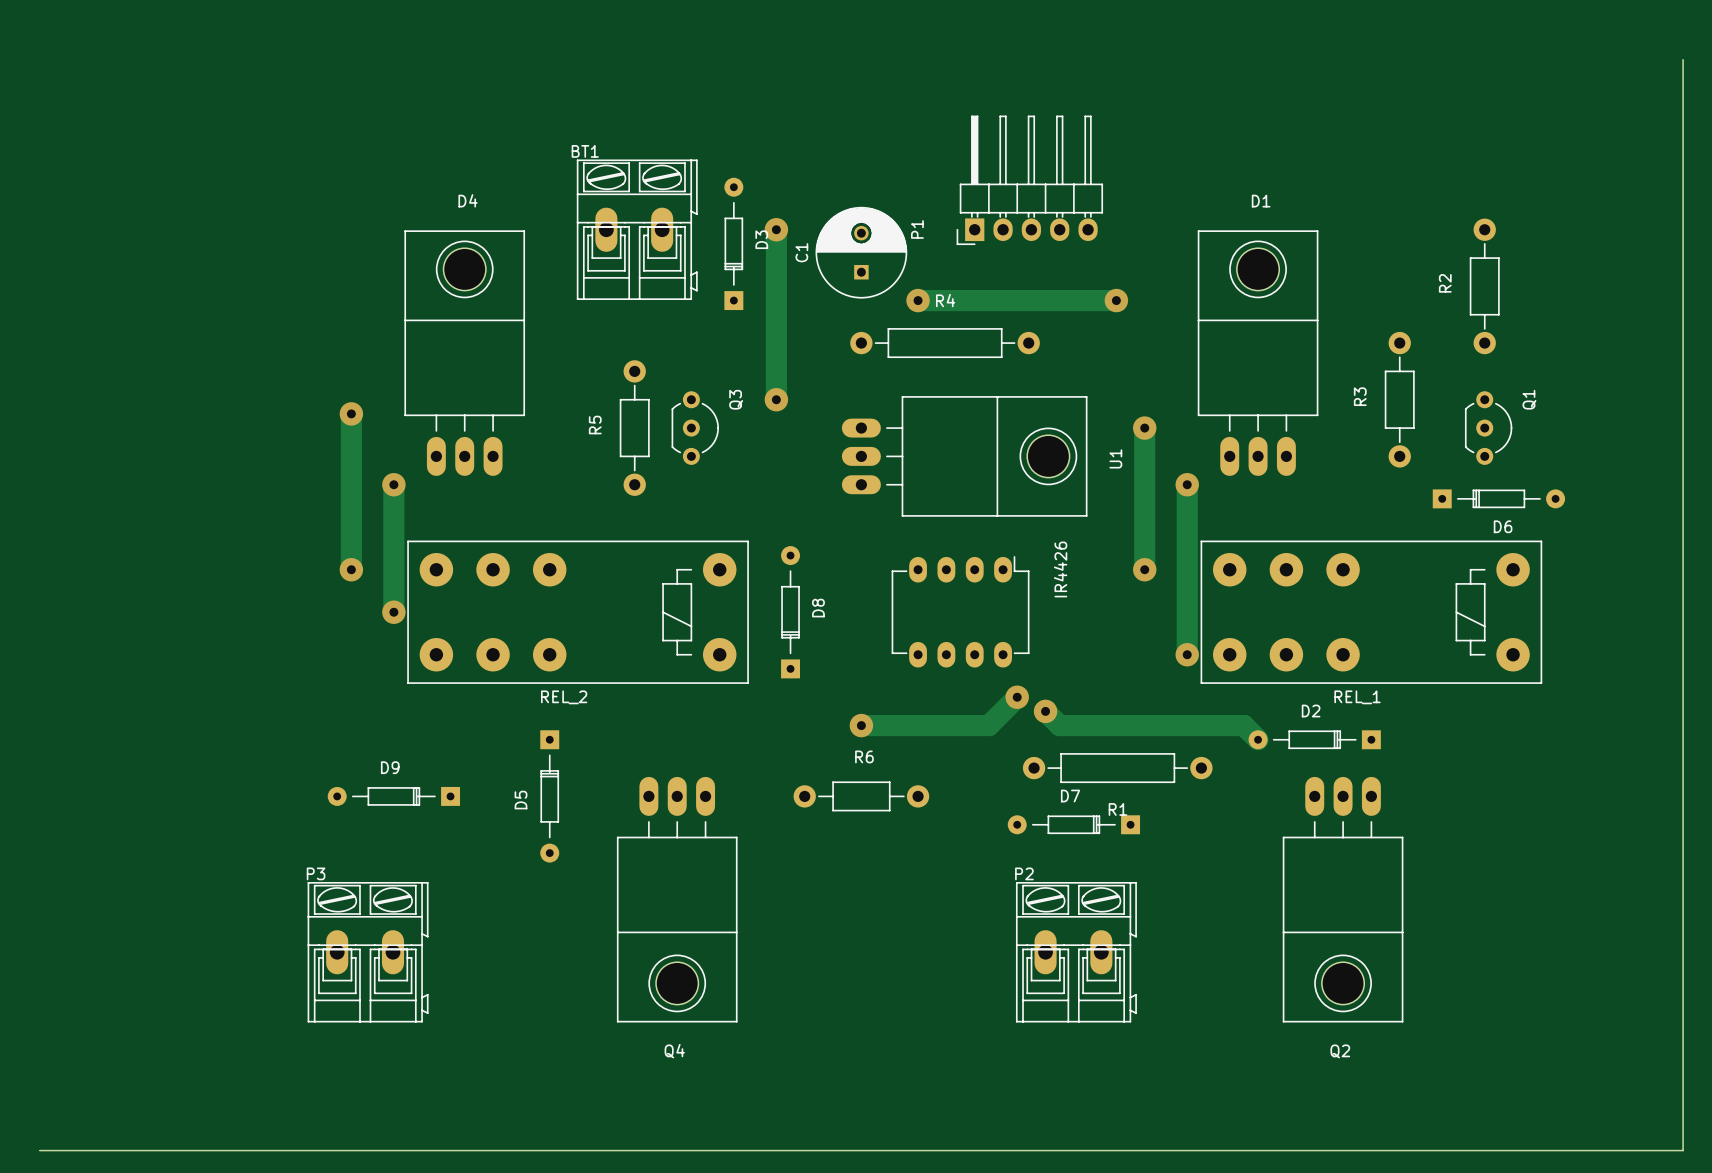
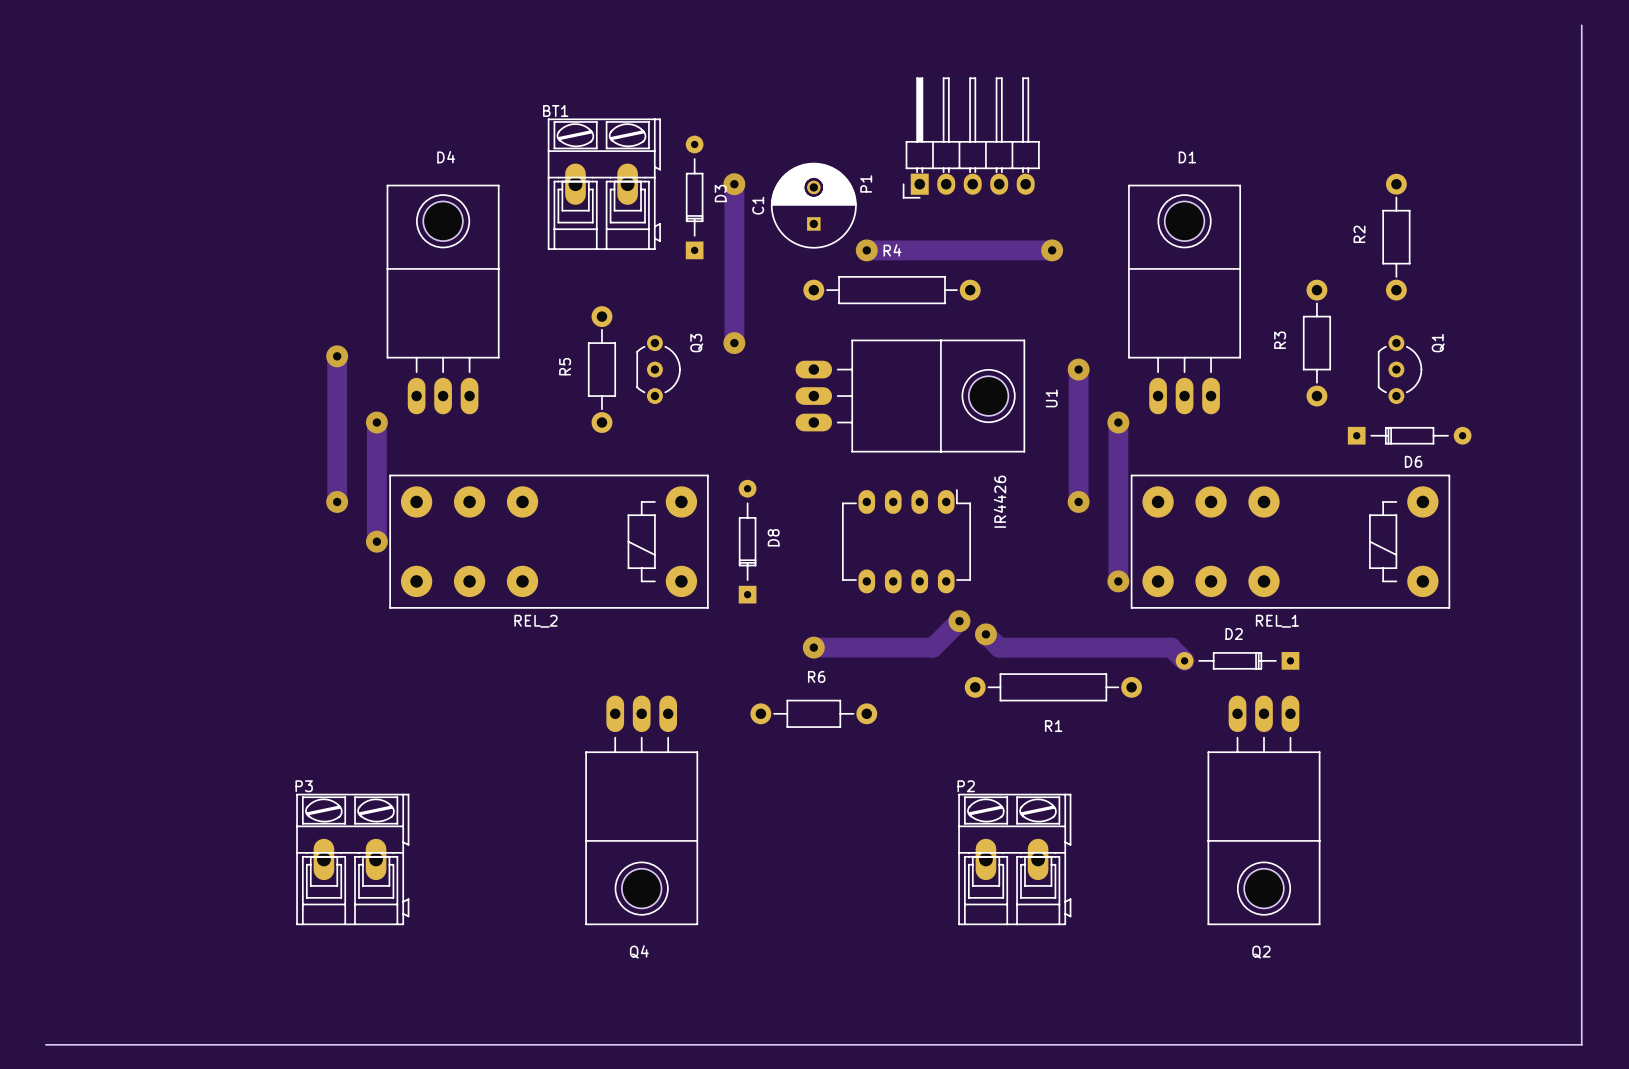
D9: (393, 796) -> none
D5: (549, 796) -> none
D7: (1073, 824) -> none

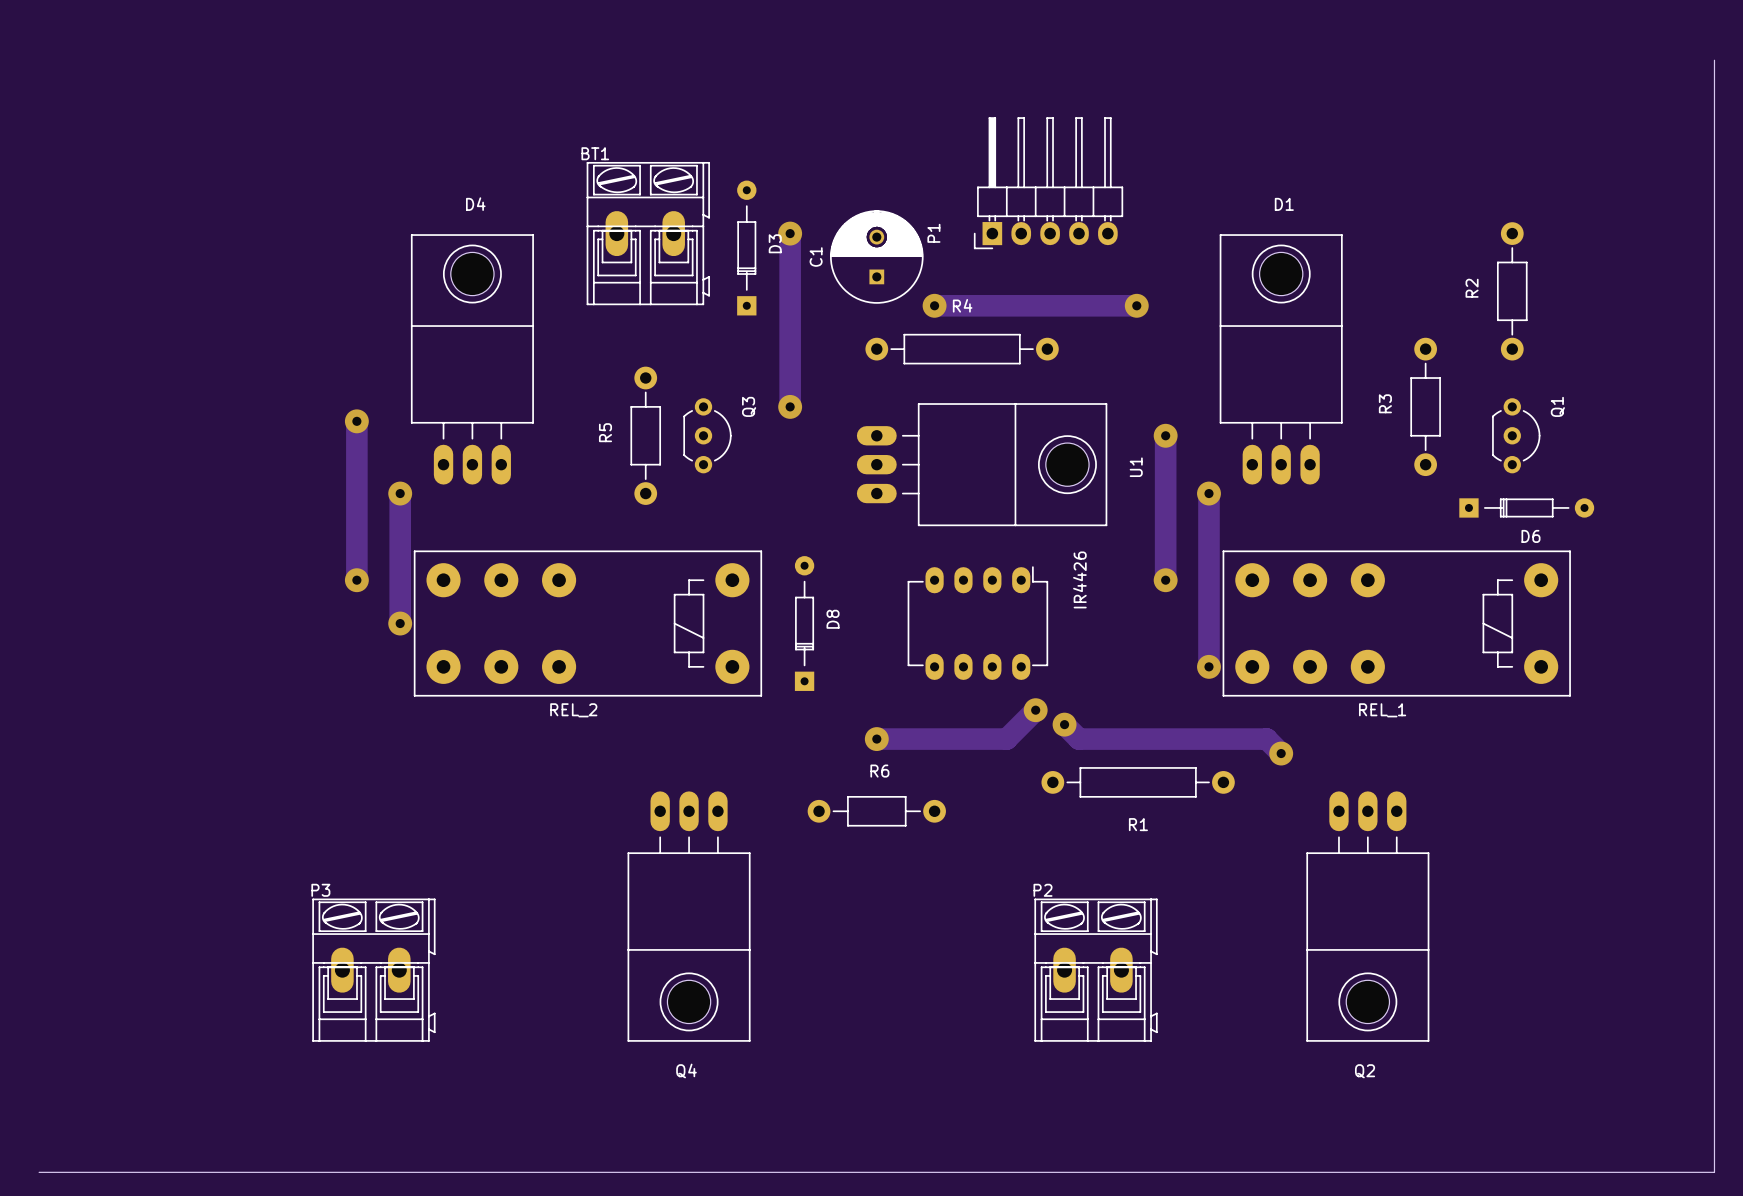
via: none -> (1281, 753)
D2: (1237, 660) -> none

